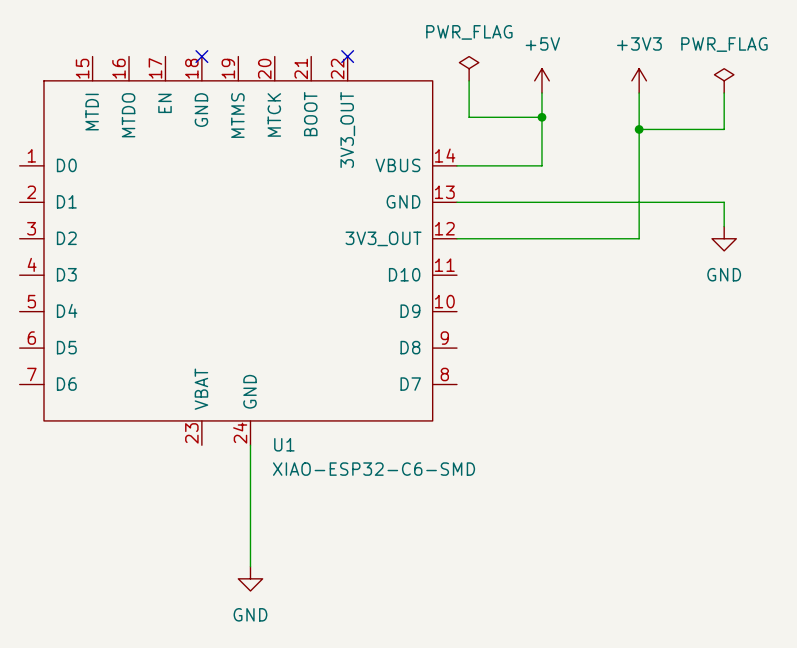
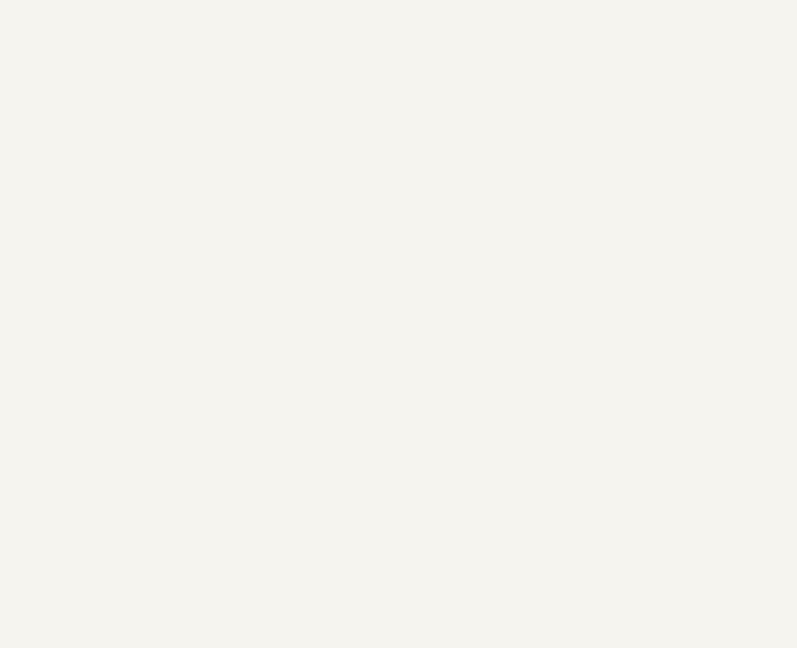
no-connect mark: (201, 56) -> none
no-connect mark: (347, 56) -> none
power symbol: PWR_FLAG (469, 68) -> none
wire: (469, 80) (469, 117) (541, 117) -> none
power symbol: +5V (541, 80) -> none
power symbol: +3V3 (639, 80) -> none
power symbol: PWR_FLAG (724, 80) -> none
wire: (541, 93) (541, 165) (456, 165) -> none
wire: (639, 93) (639, 238) (456, 238) -> none
wire: (724, 93) (724, 129) (639, 129) -> none
junction: (541, 117) -> none
junction: (639, 129) -> none
wire: (456, 202) (724, 202) (724, 226) -> none
power symbol: GND (724, 238) -> none
U1: XIAO-ESP32-C6-SMD (238, 250) -> none
wire: (250, 445) (250, 566) -> none
power symbol: GND (250, 578) -> none

